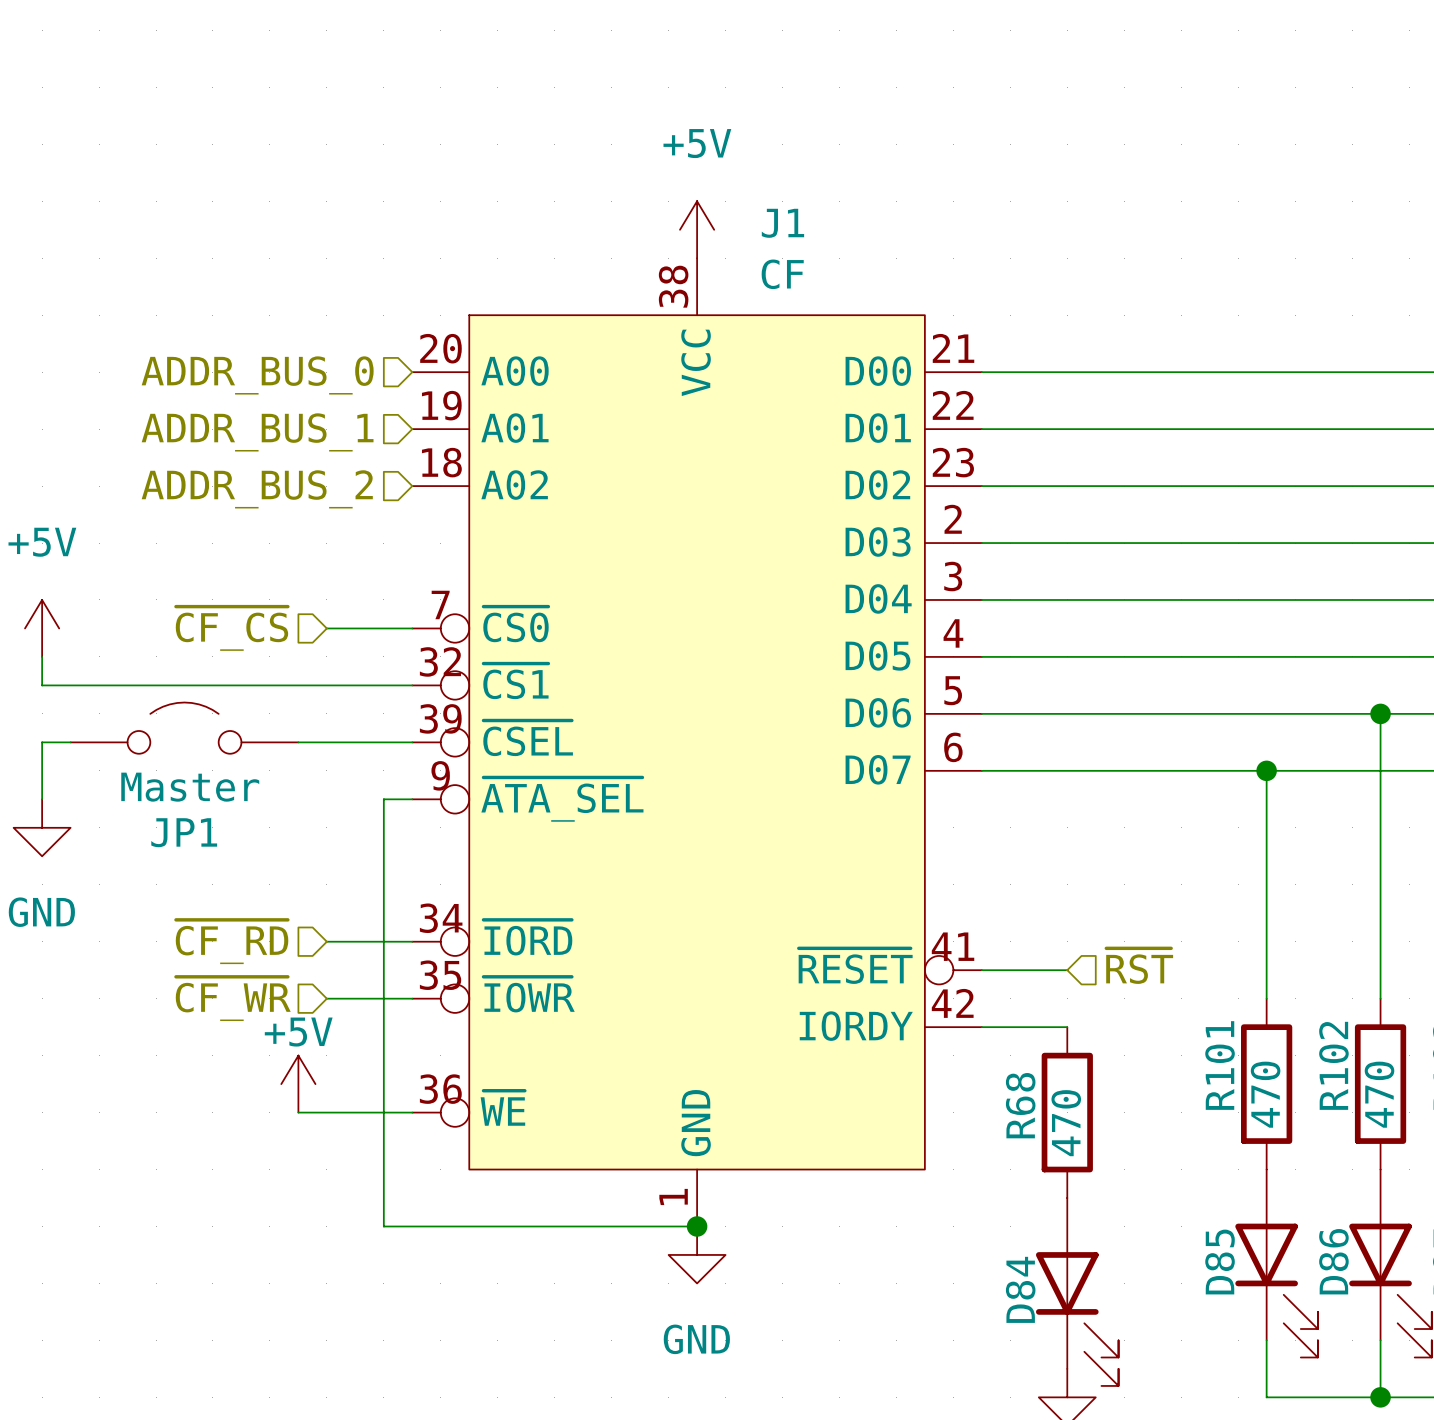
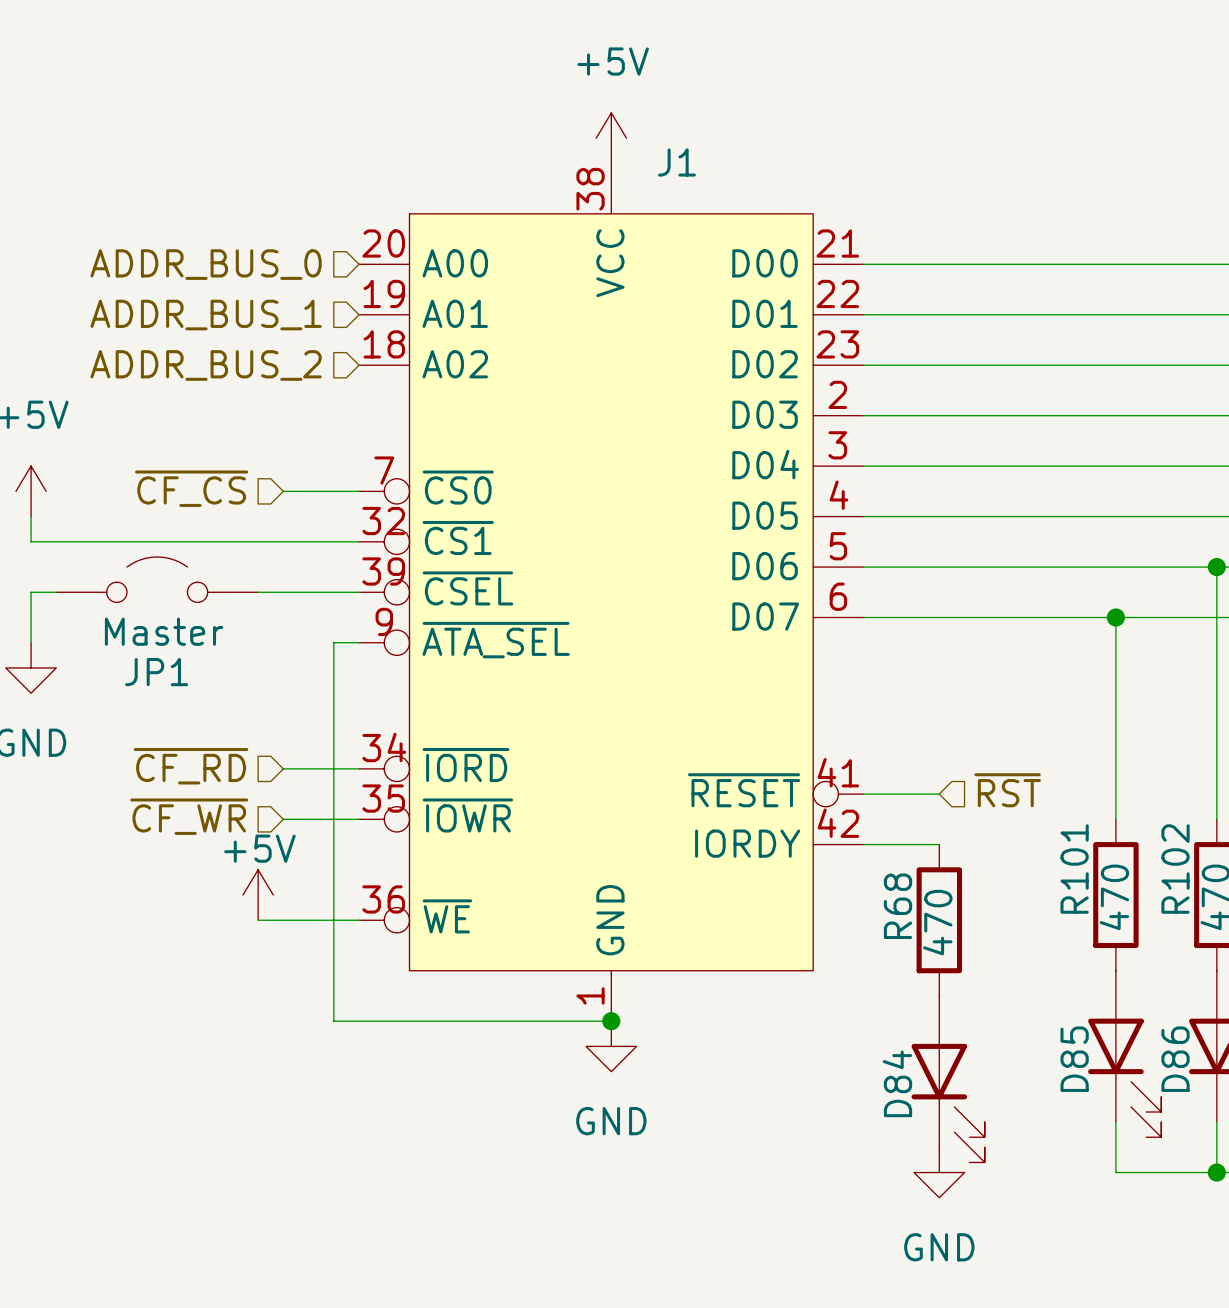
J1 name position: J1 (782, 223) -> J1 (676, 162)
J1 value: CF (782, 274) -> none

